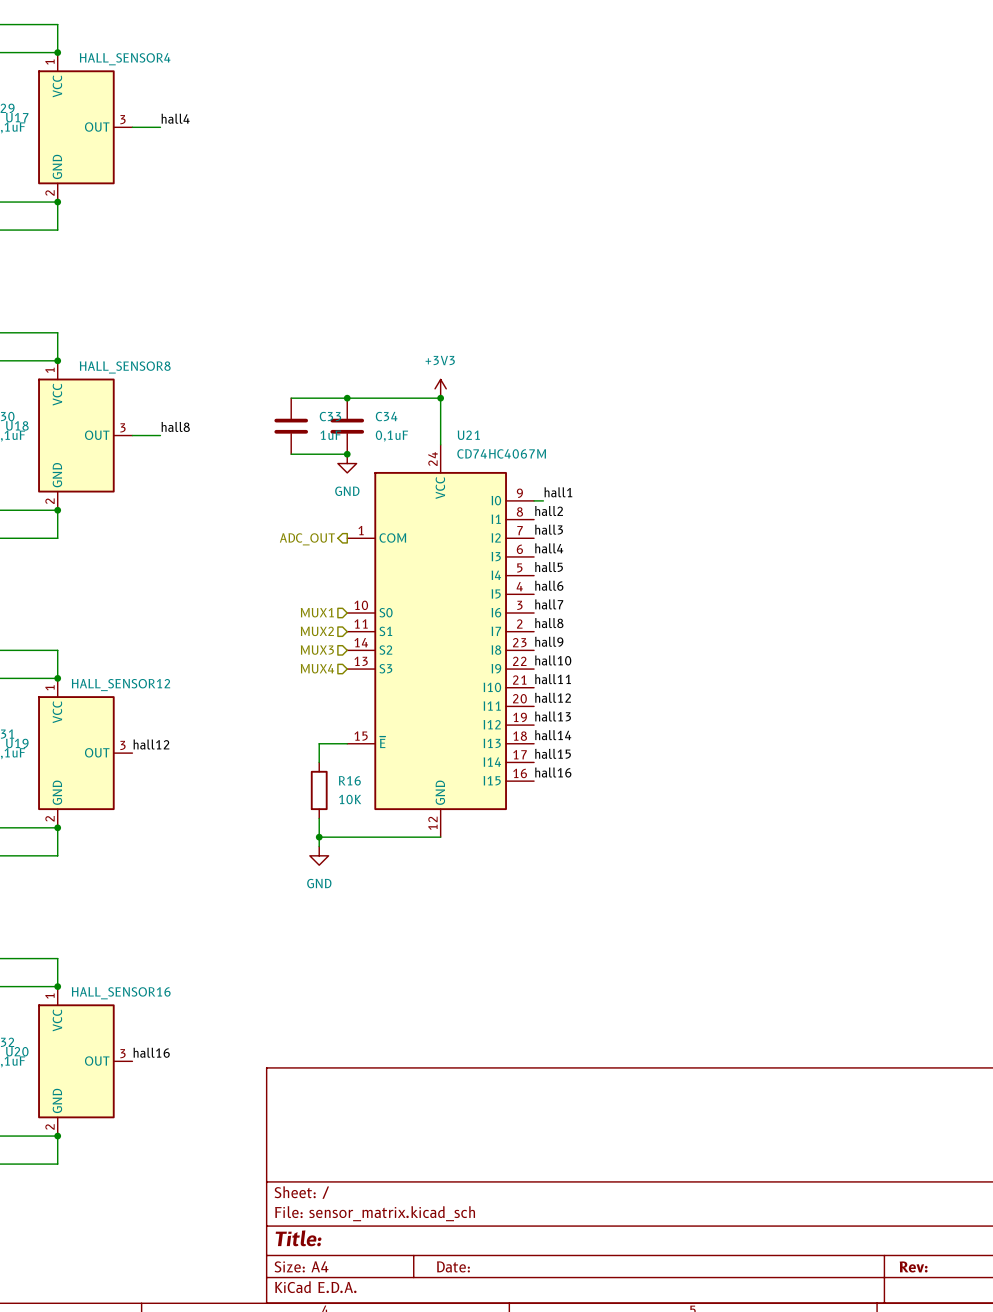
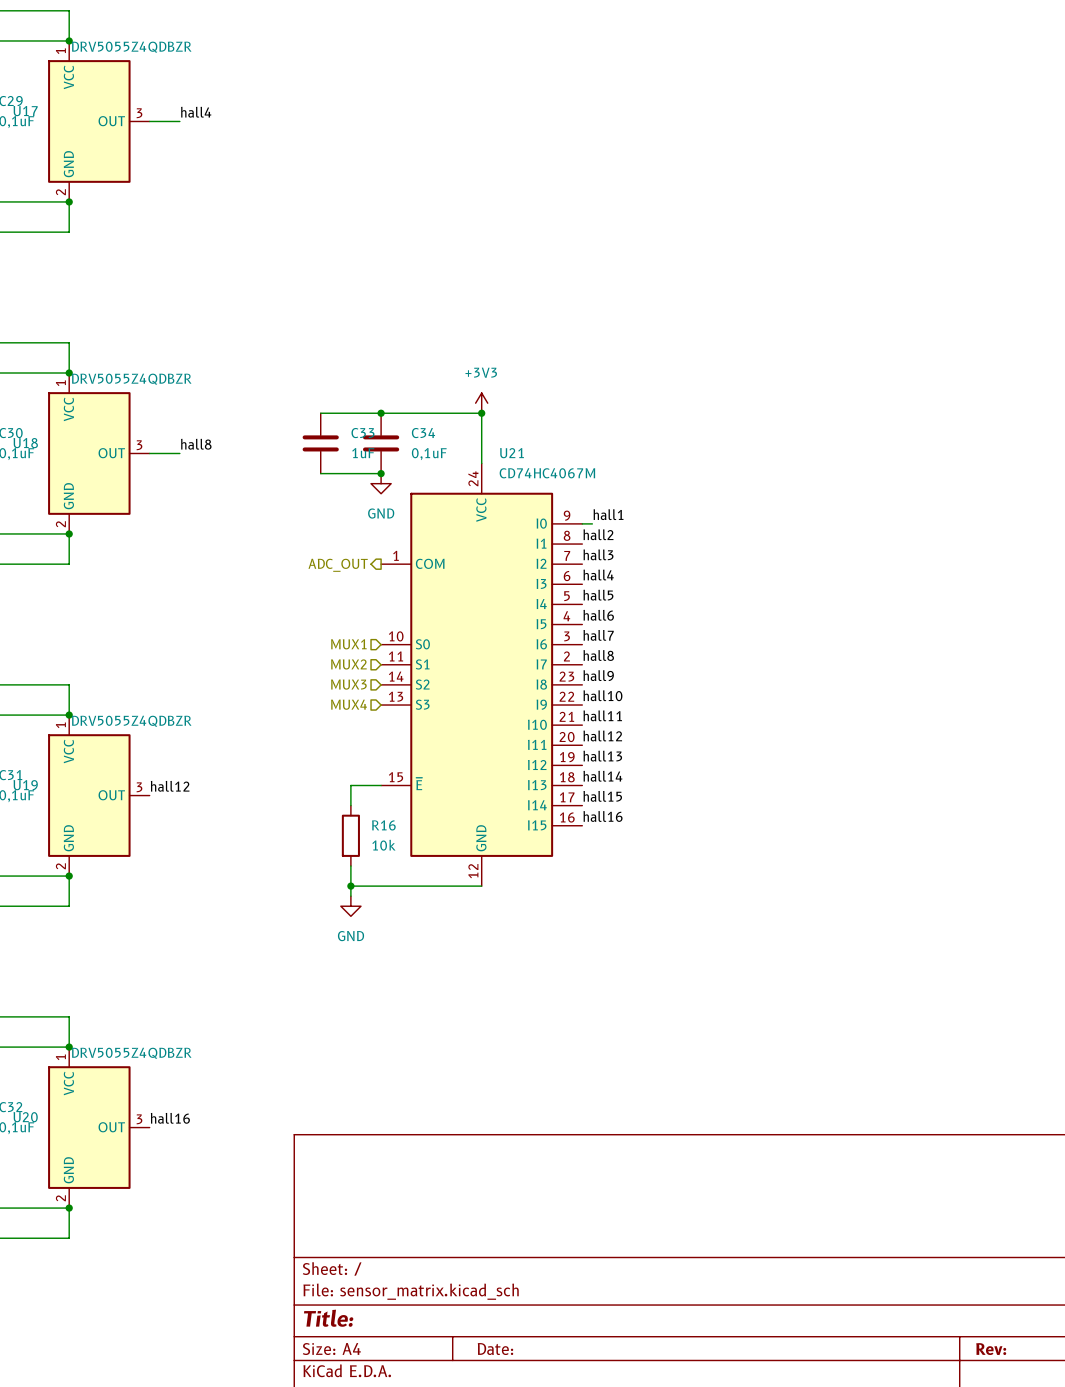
U17 value: HALL_SENSOR4 (125, 59) -> DRV5055Z4QDBZR (131, 47)
U18 value: HALL_SENSOR8 (125, 367) -> DRV5055Z4QDBZR (131, 379)
U19 value: HALL_SENSOR12 (120, 685) -> DRV5055Z4QDBZR (131, 721)
R16 value: 10K (350, 799) -> 10k (383, 845)
U20 value: HALL_SENSOR16 (121, 993) -> DRV5055Z4QDBZR (131, 1053)

